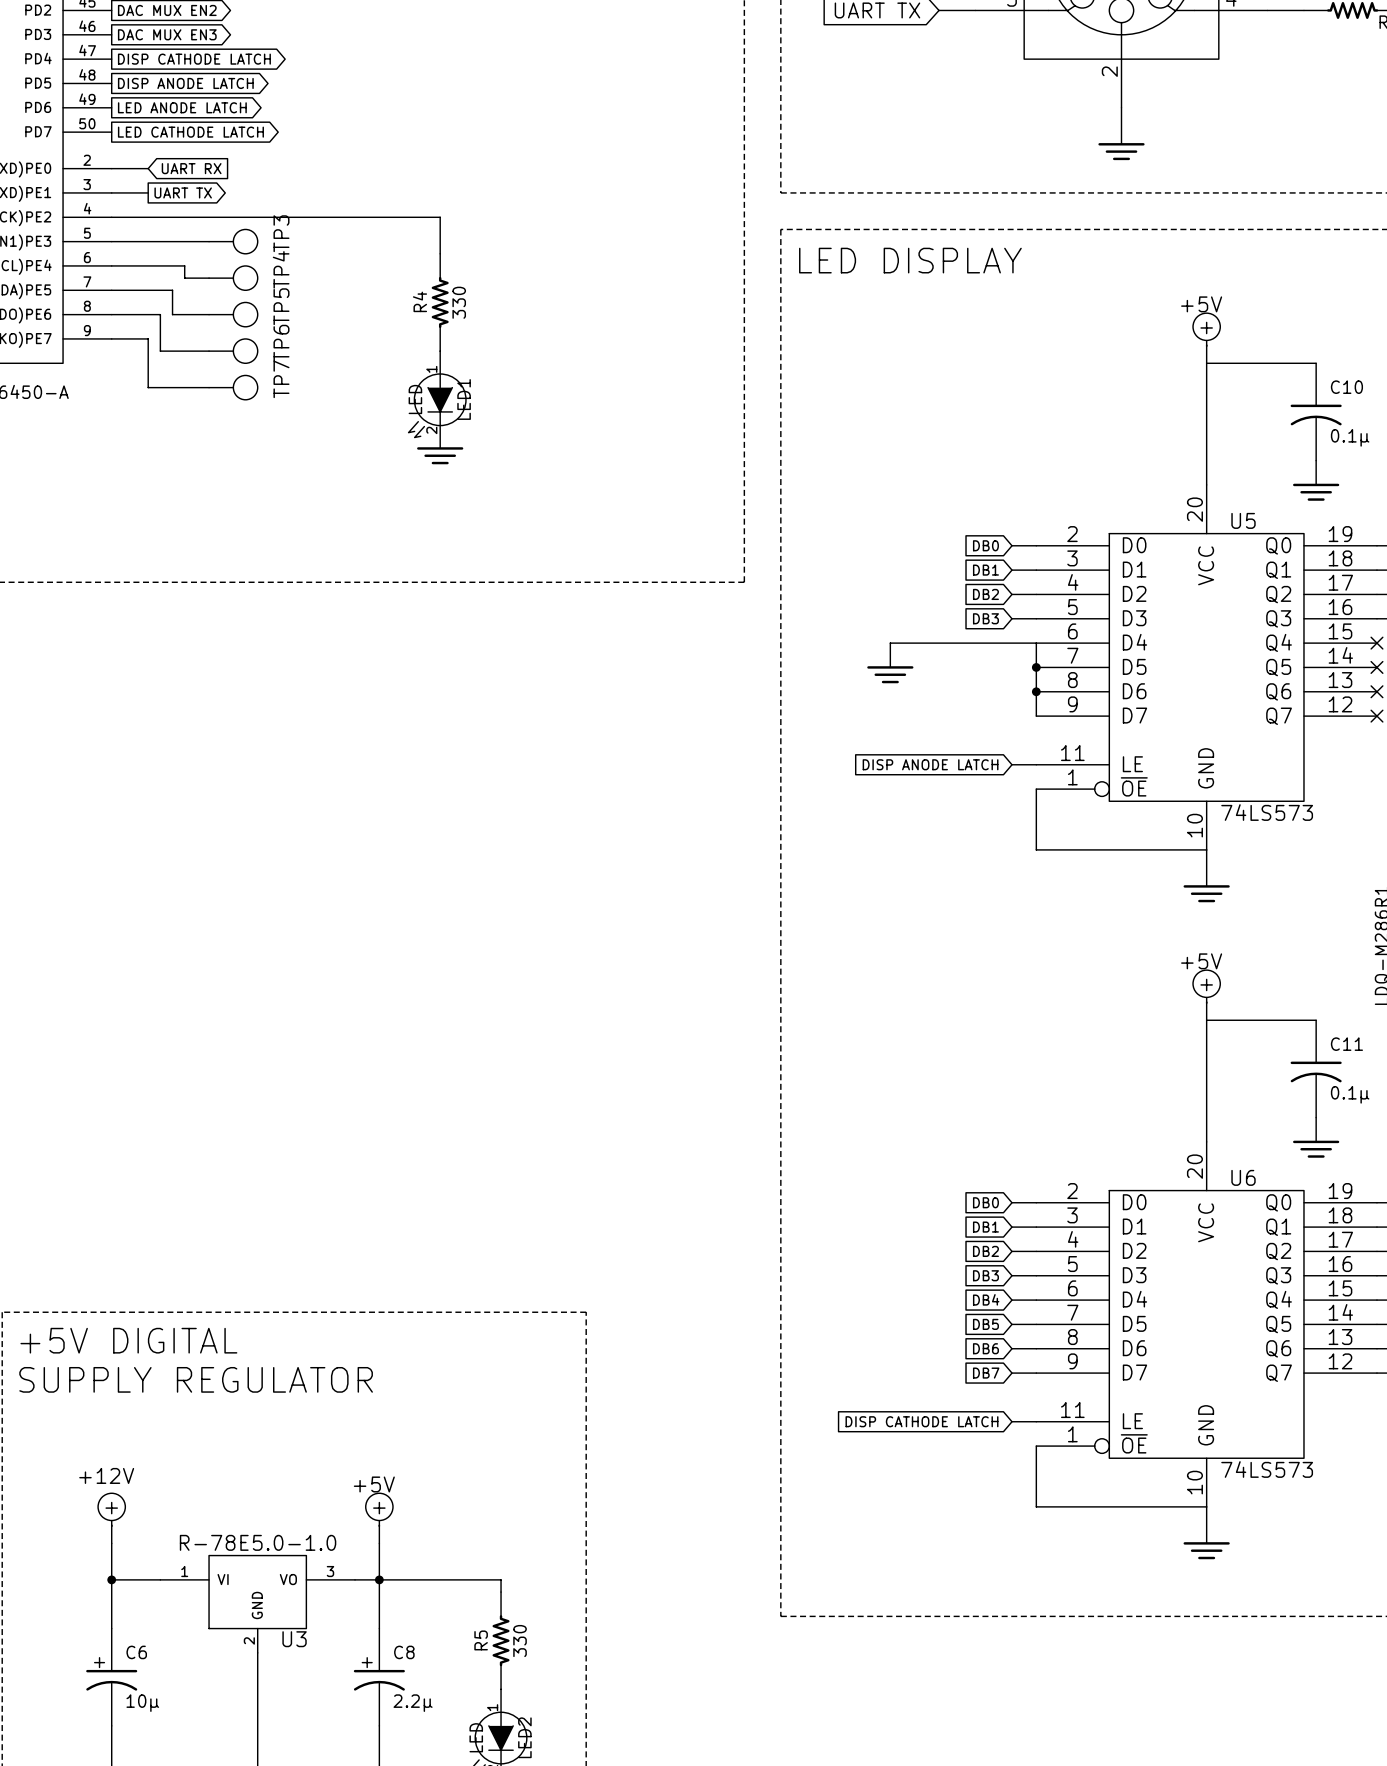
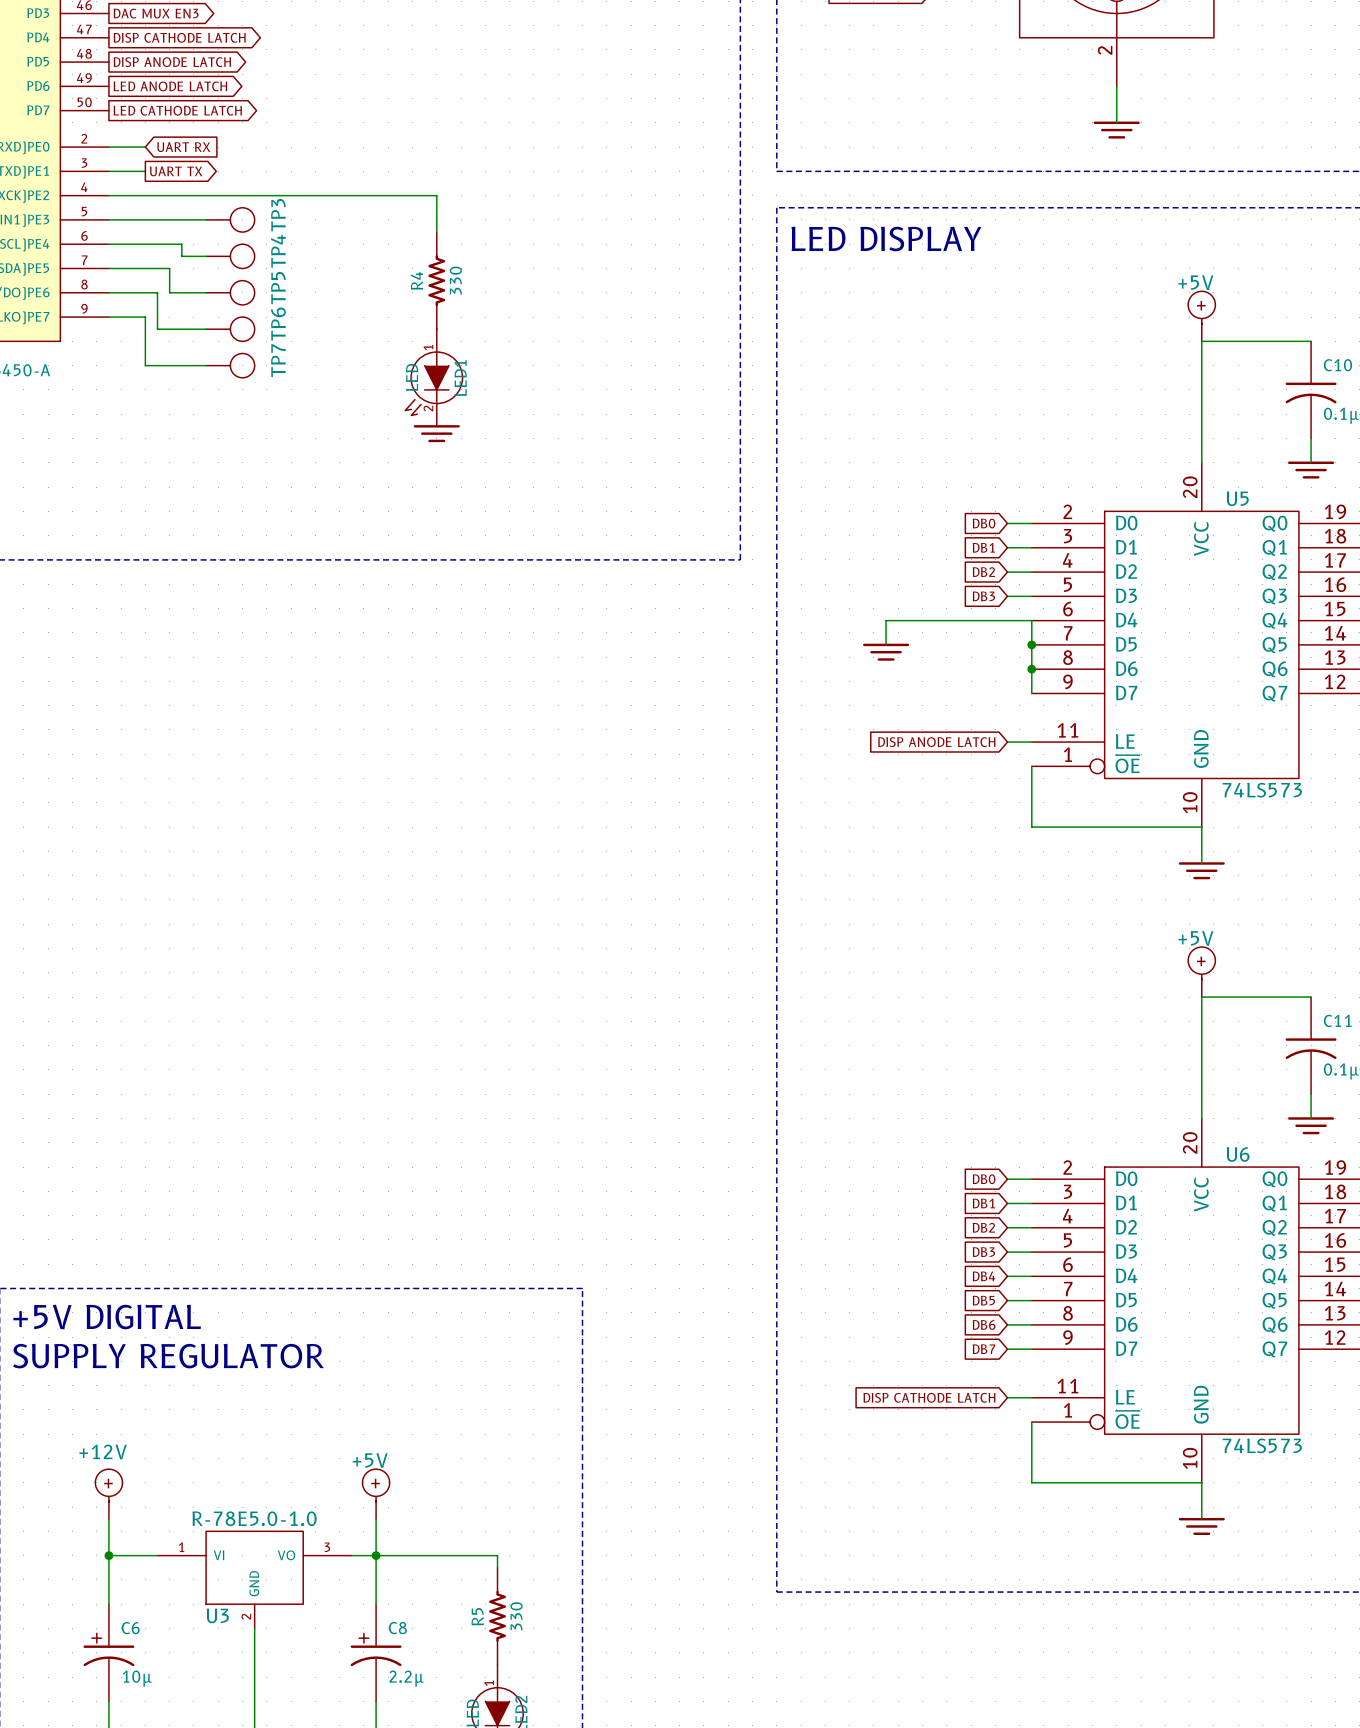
U3 name position: U3 (294, 1639) -> U3 (217, 1615)

